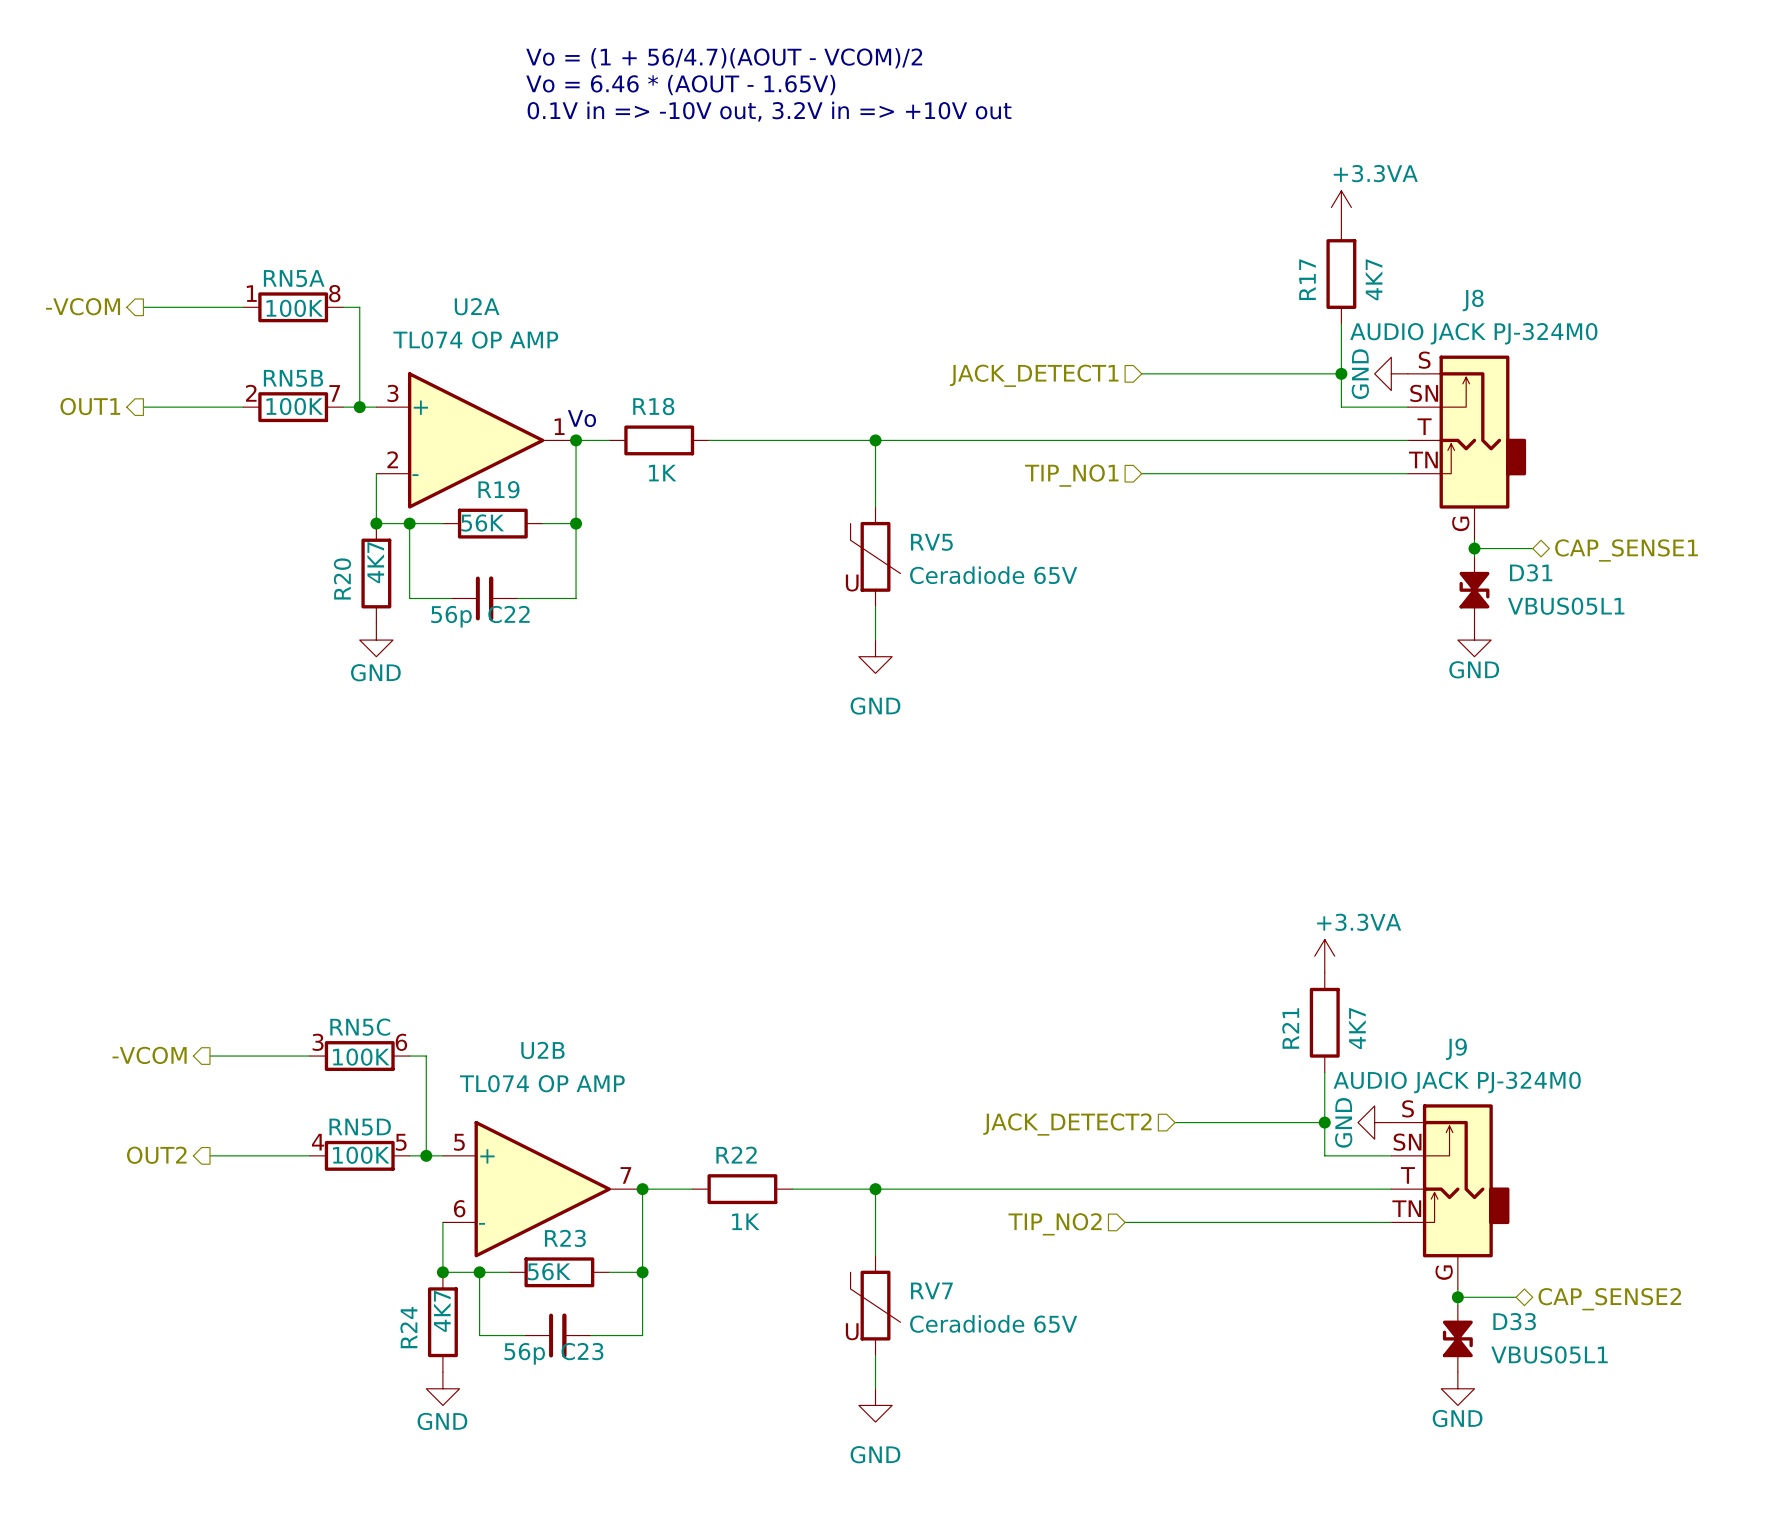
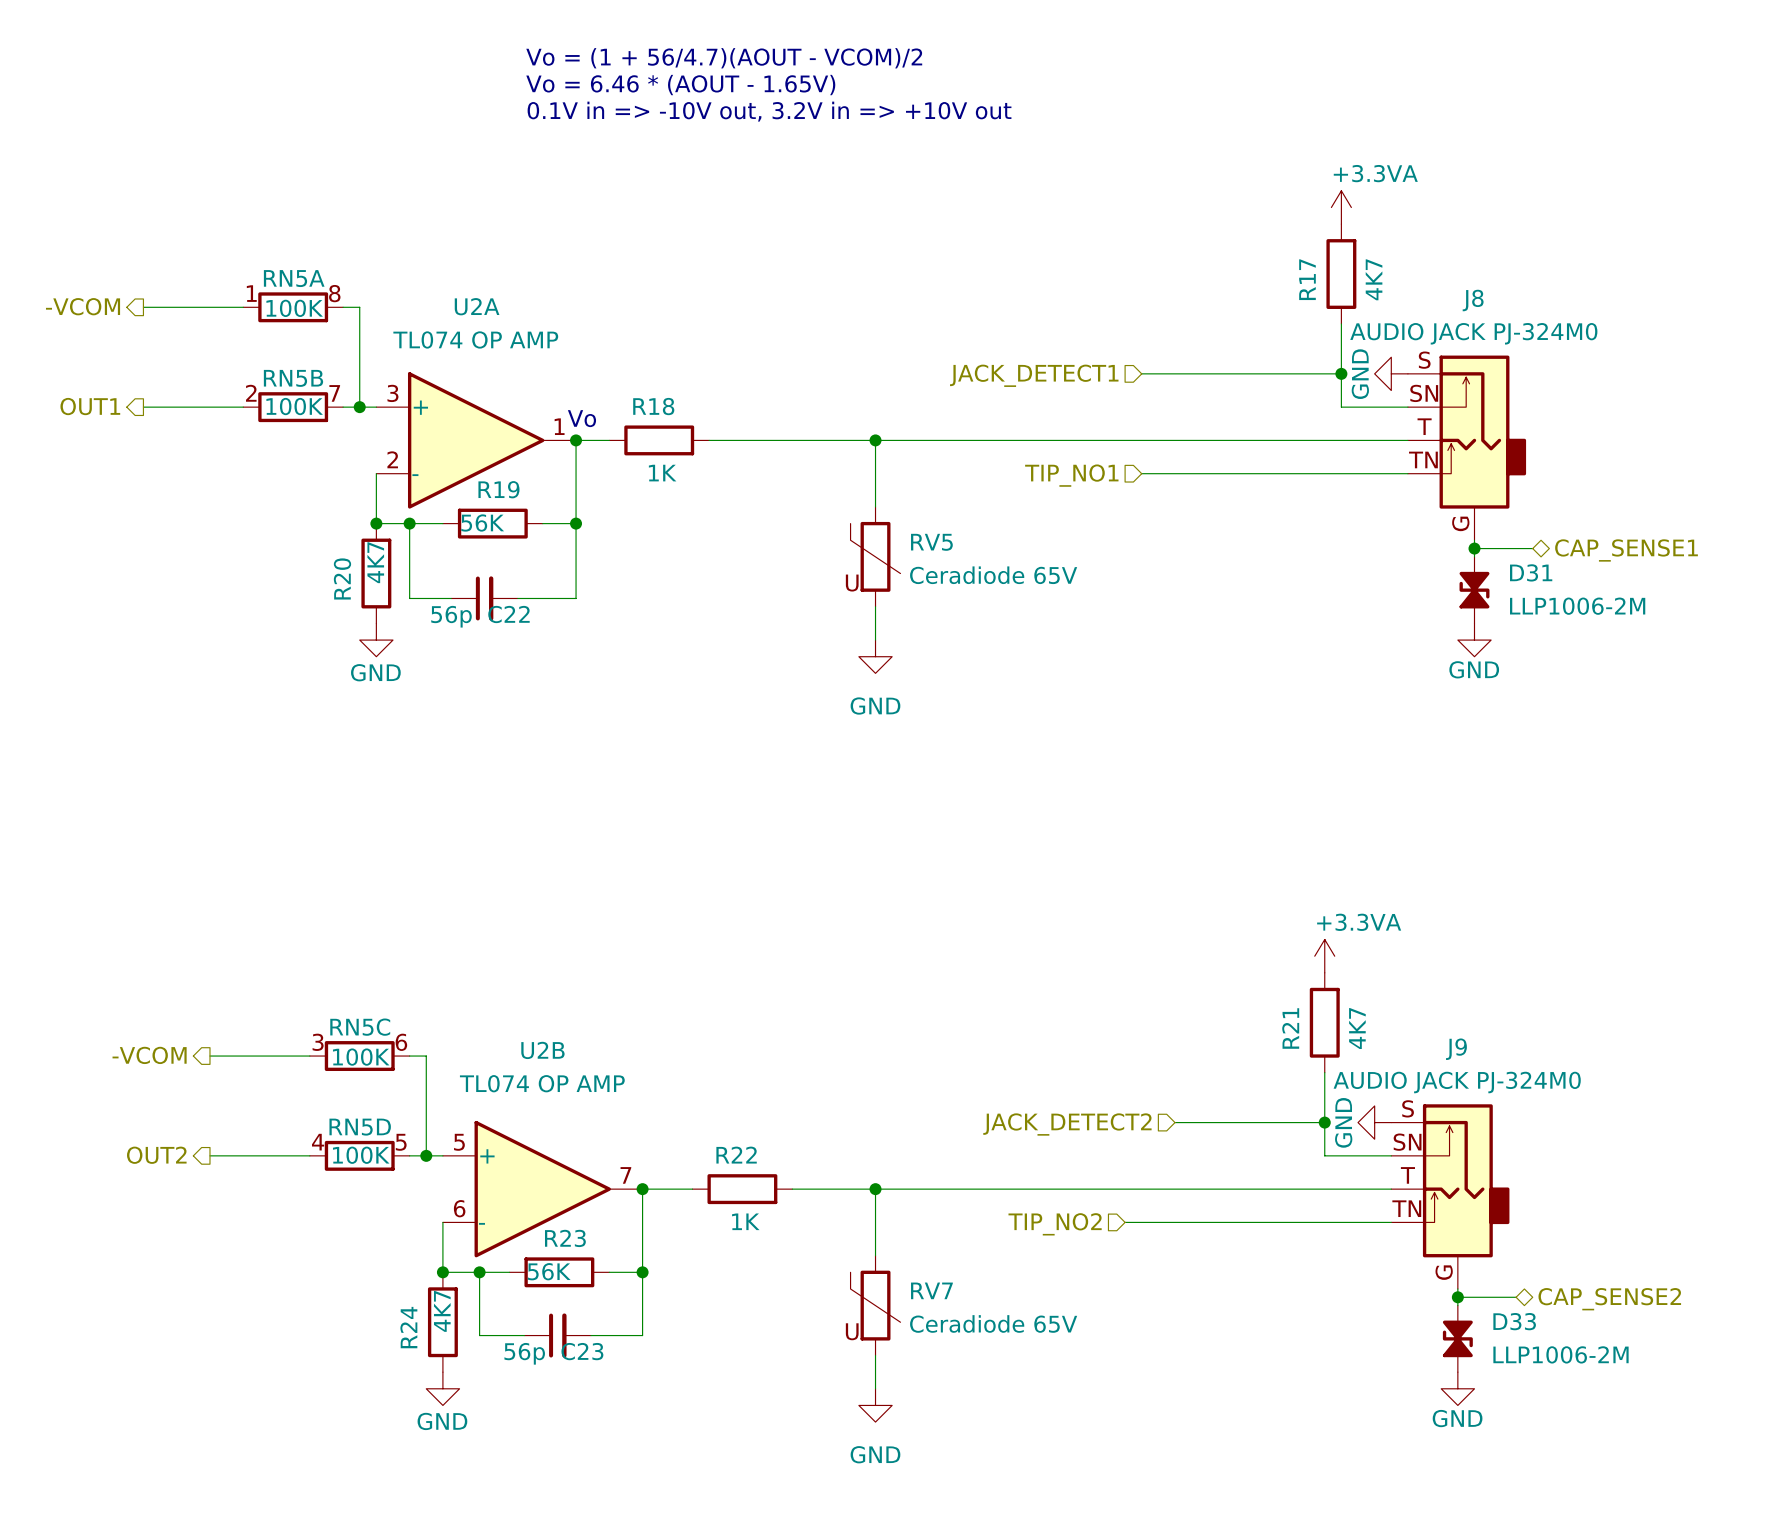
D31 value: VBUS05L1 (1566, 606) -> LLP1006-2M (1577, 606)
D33 value: VBUS05L1 (1549, 1354) -> LLP1006-2M (1561, 1354)

